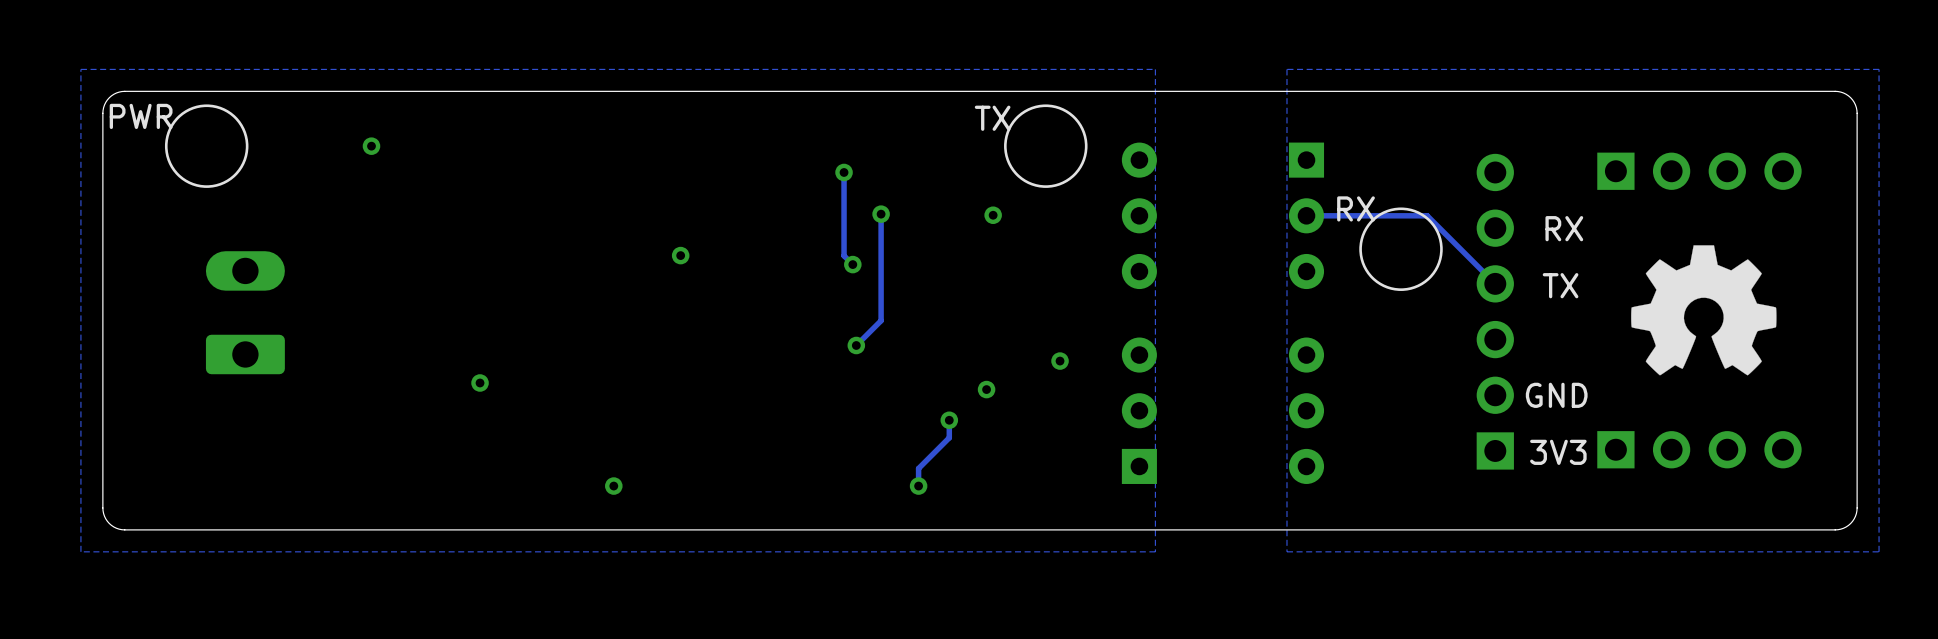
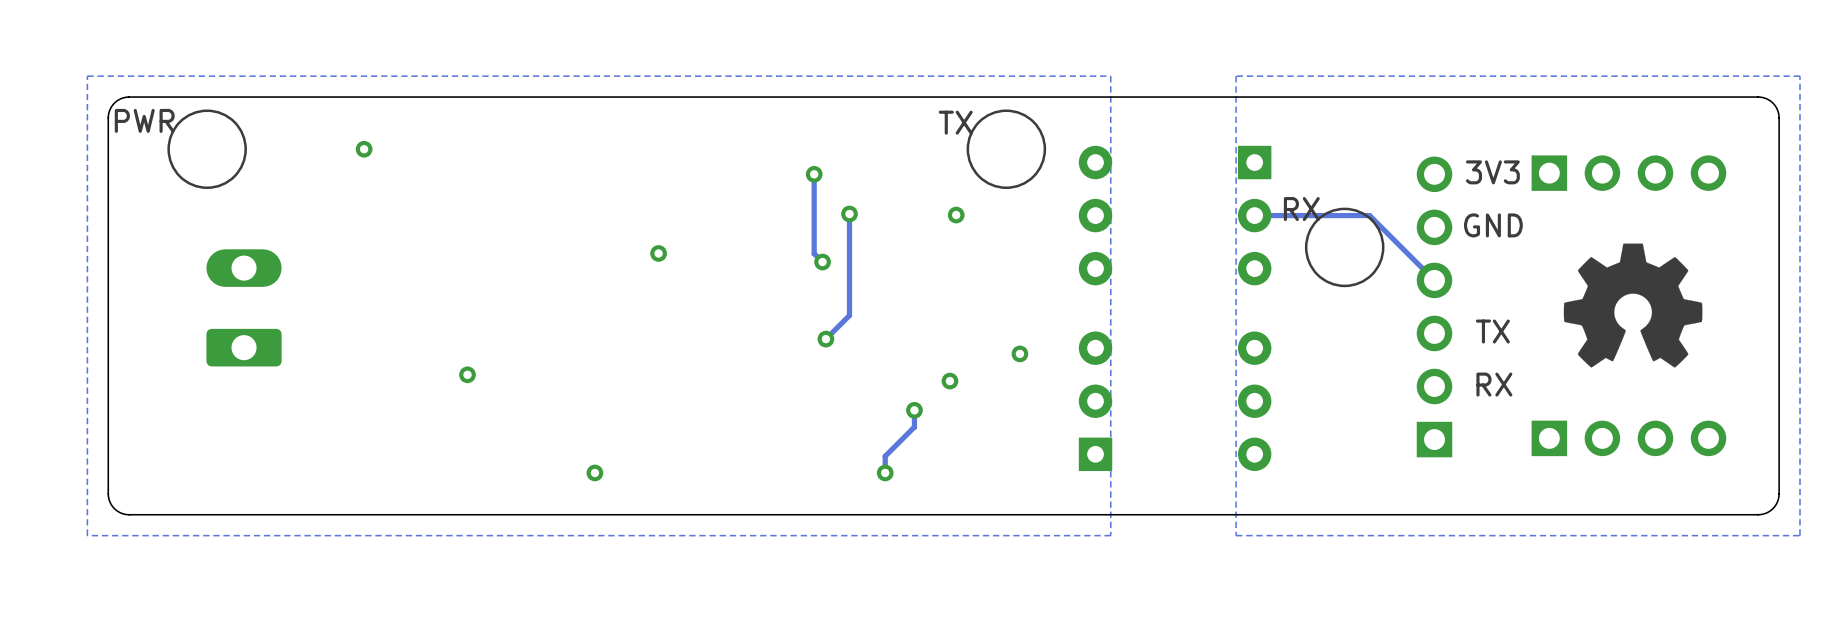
text: RX (1564, 228) -> GND (1493, 225)
text position: TX (1560, 285) -> TX (1492, 331)
text: GND (1556, 395) -> RX (1494, 384)
text position: 3V3 (1558, 452) -> 3V3 (1492, 172)

